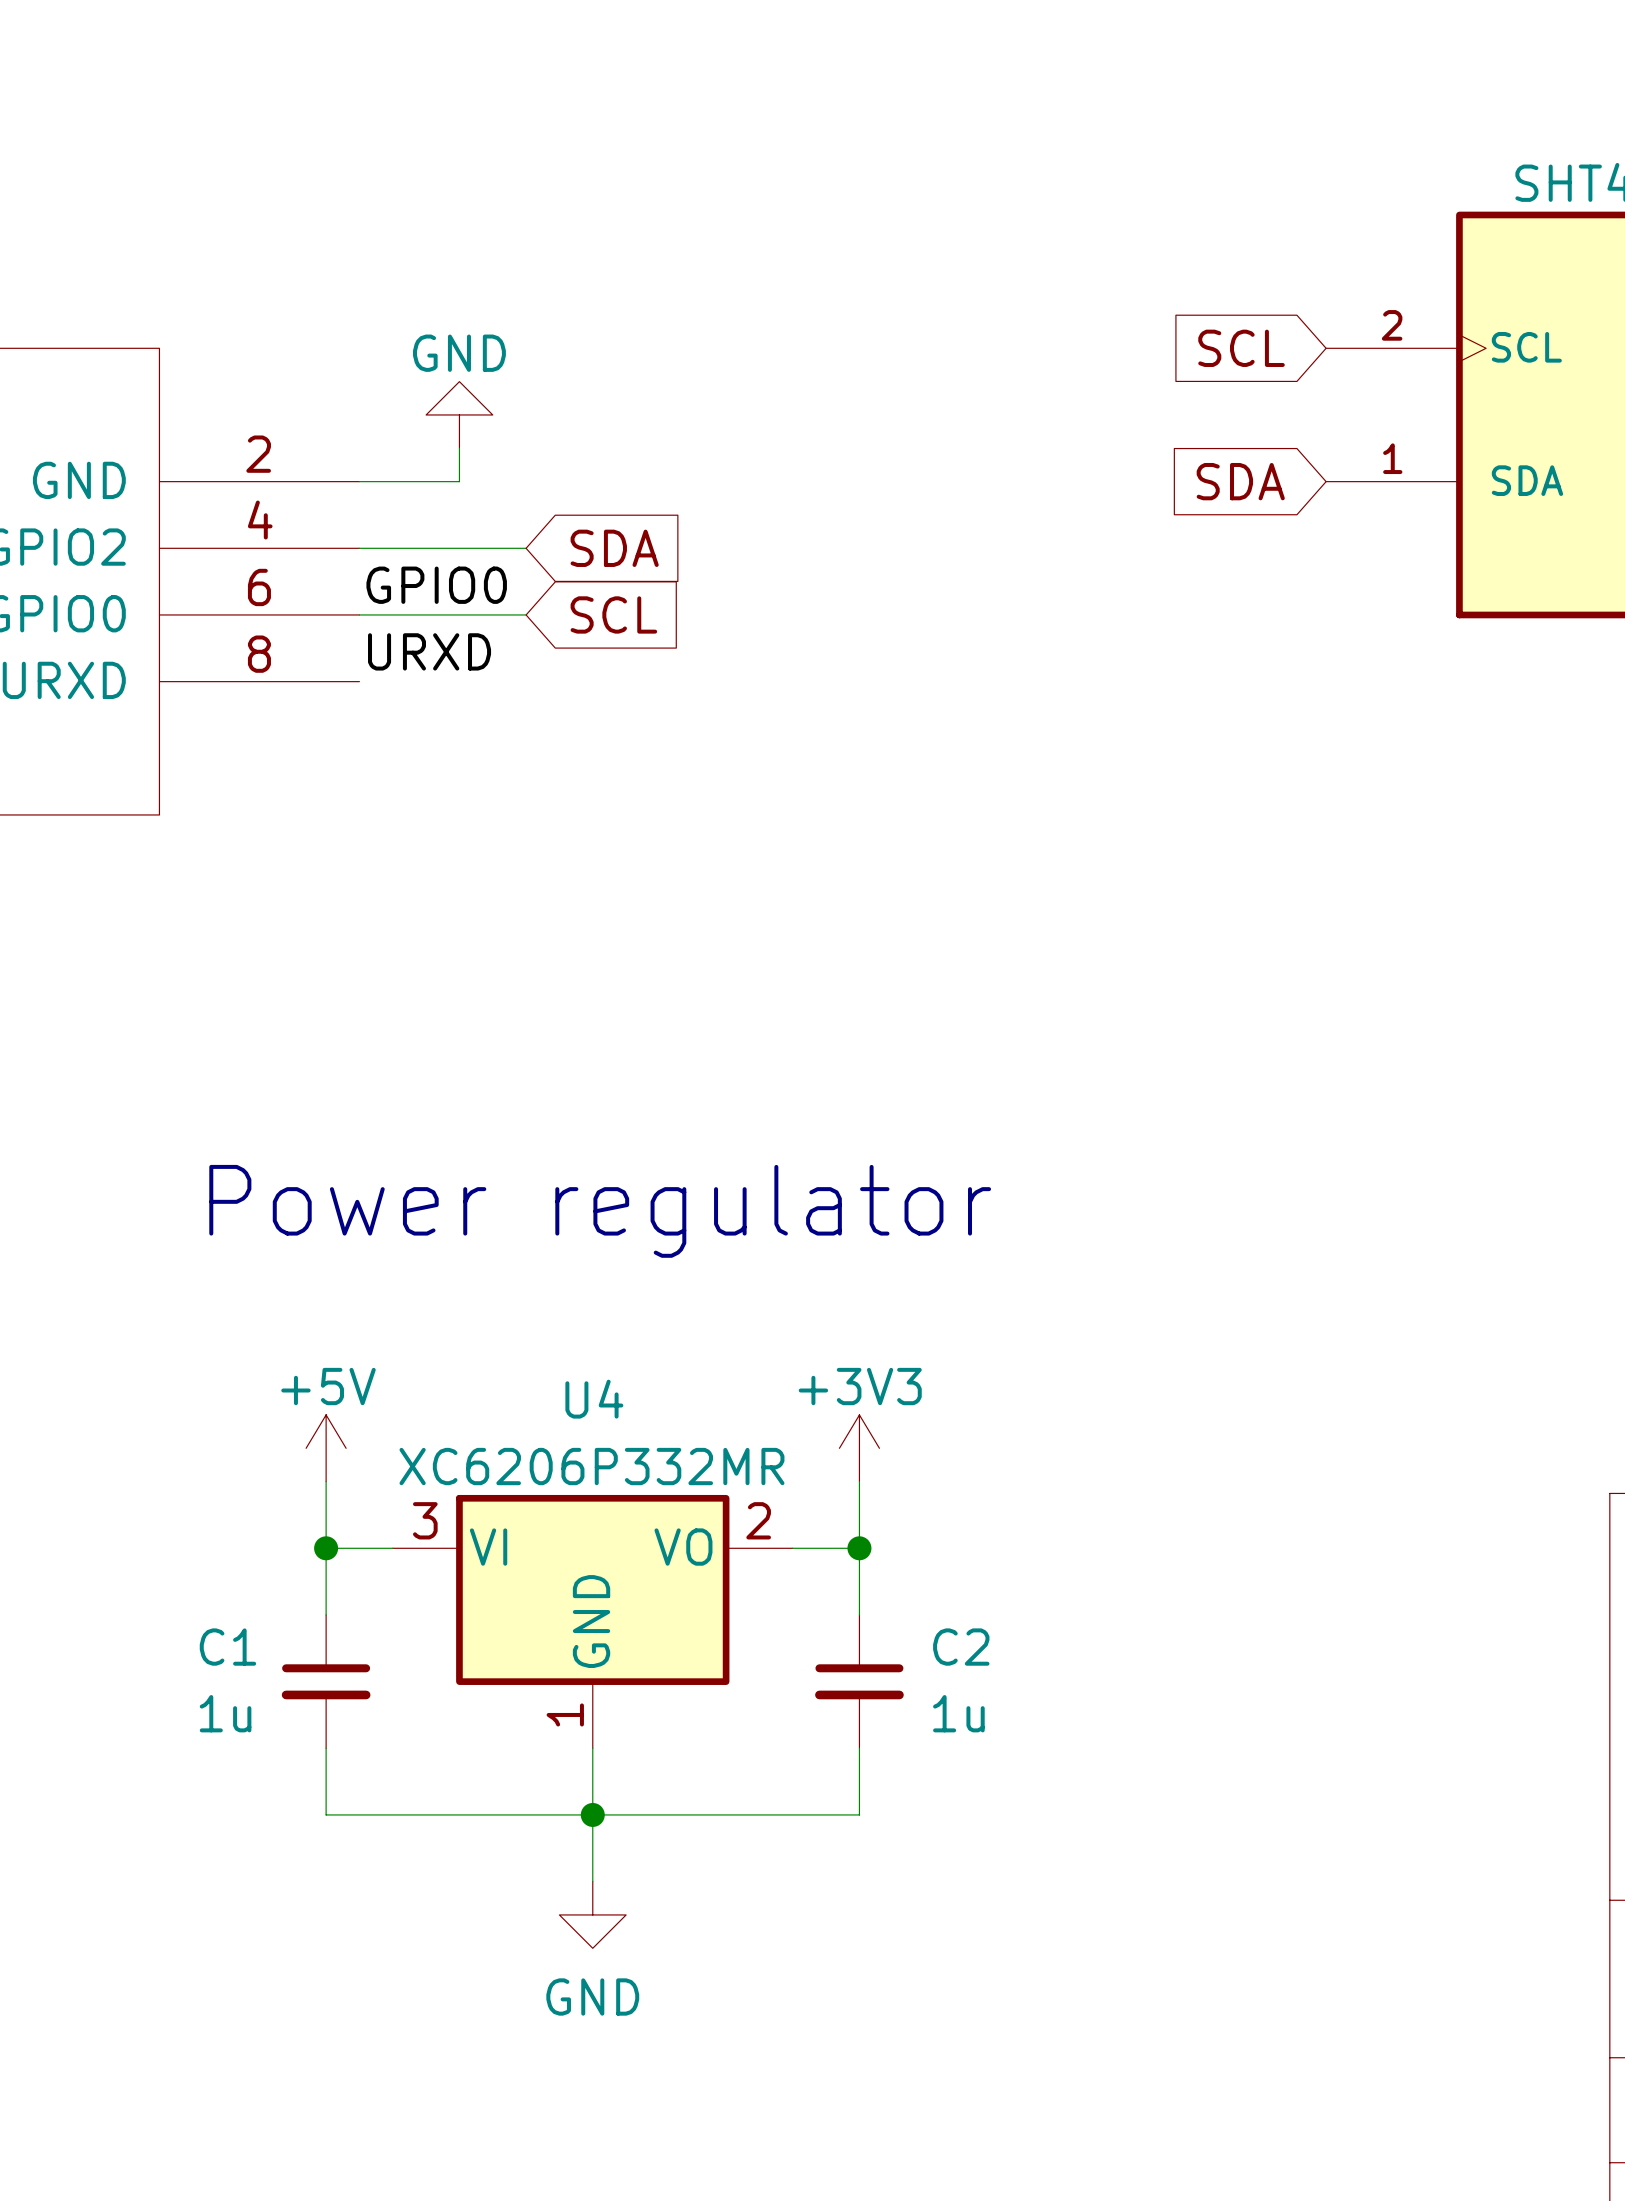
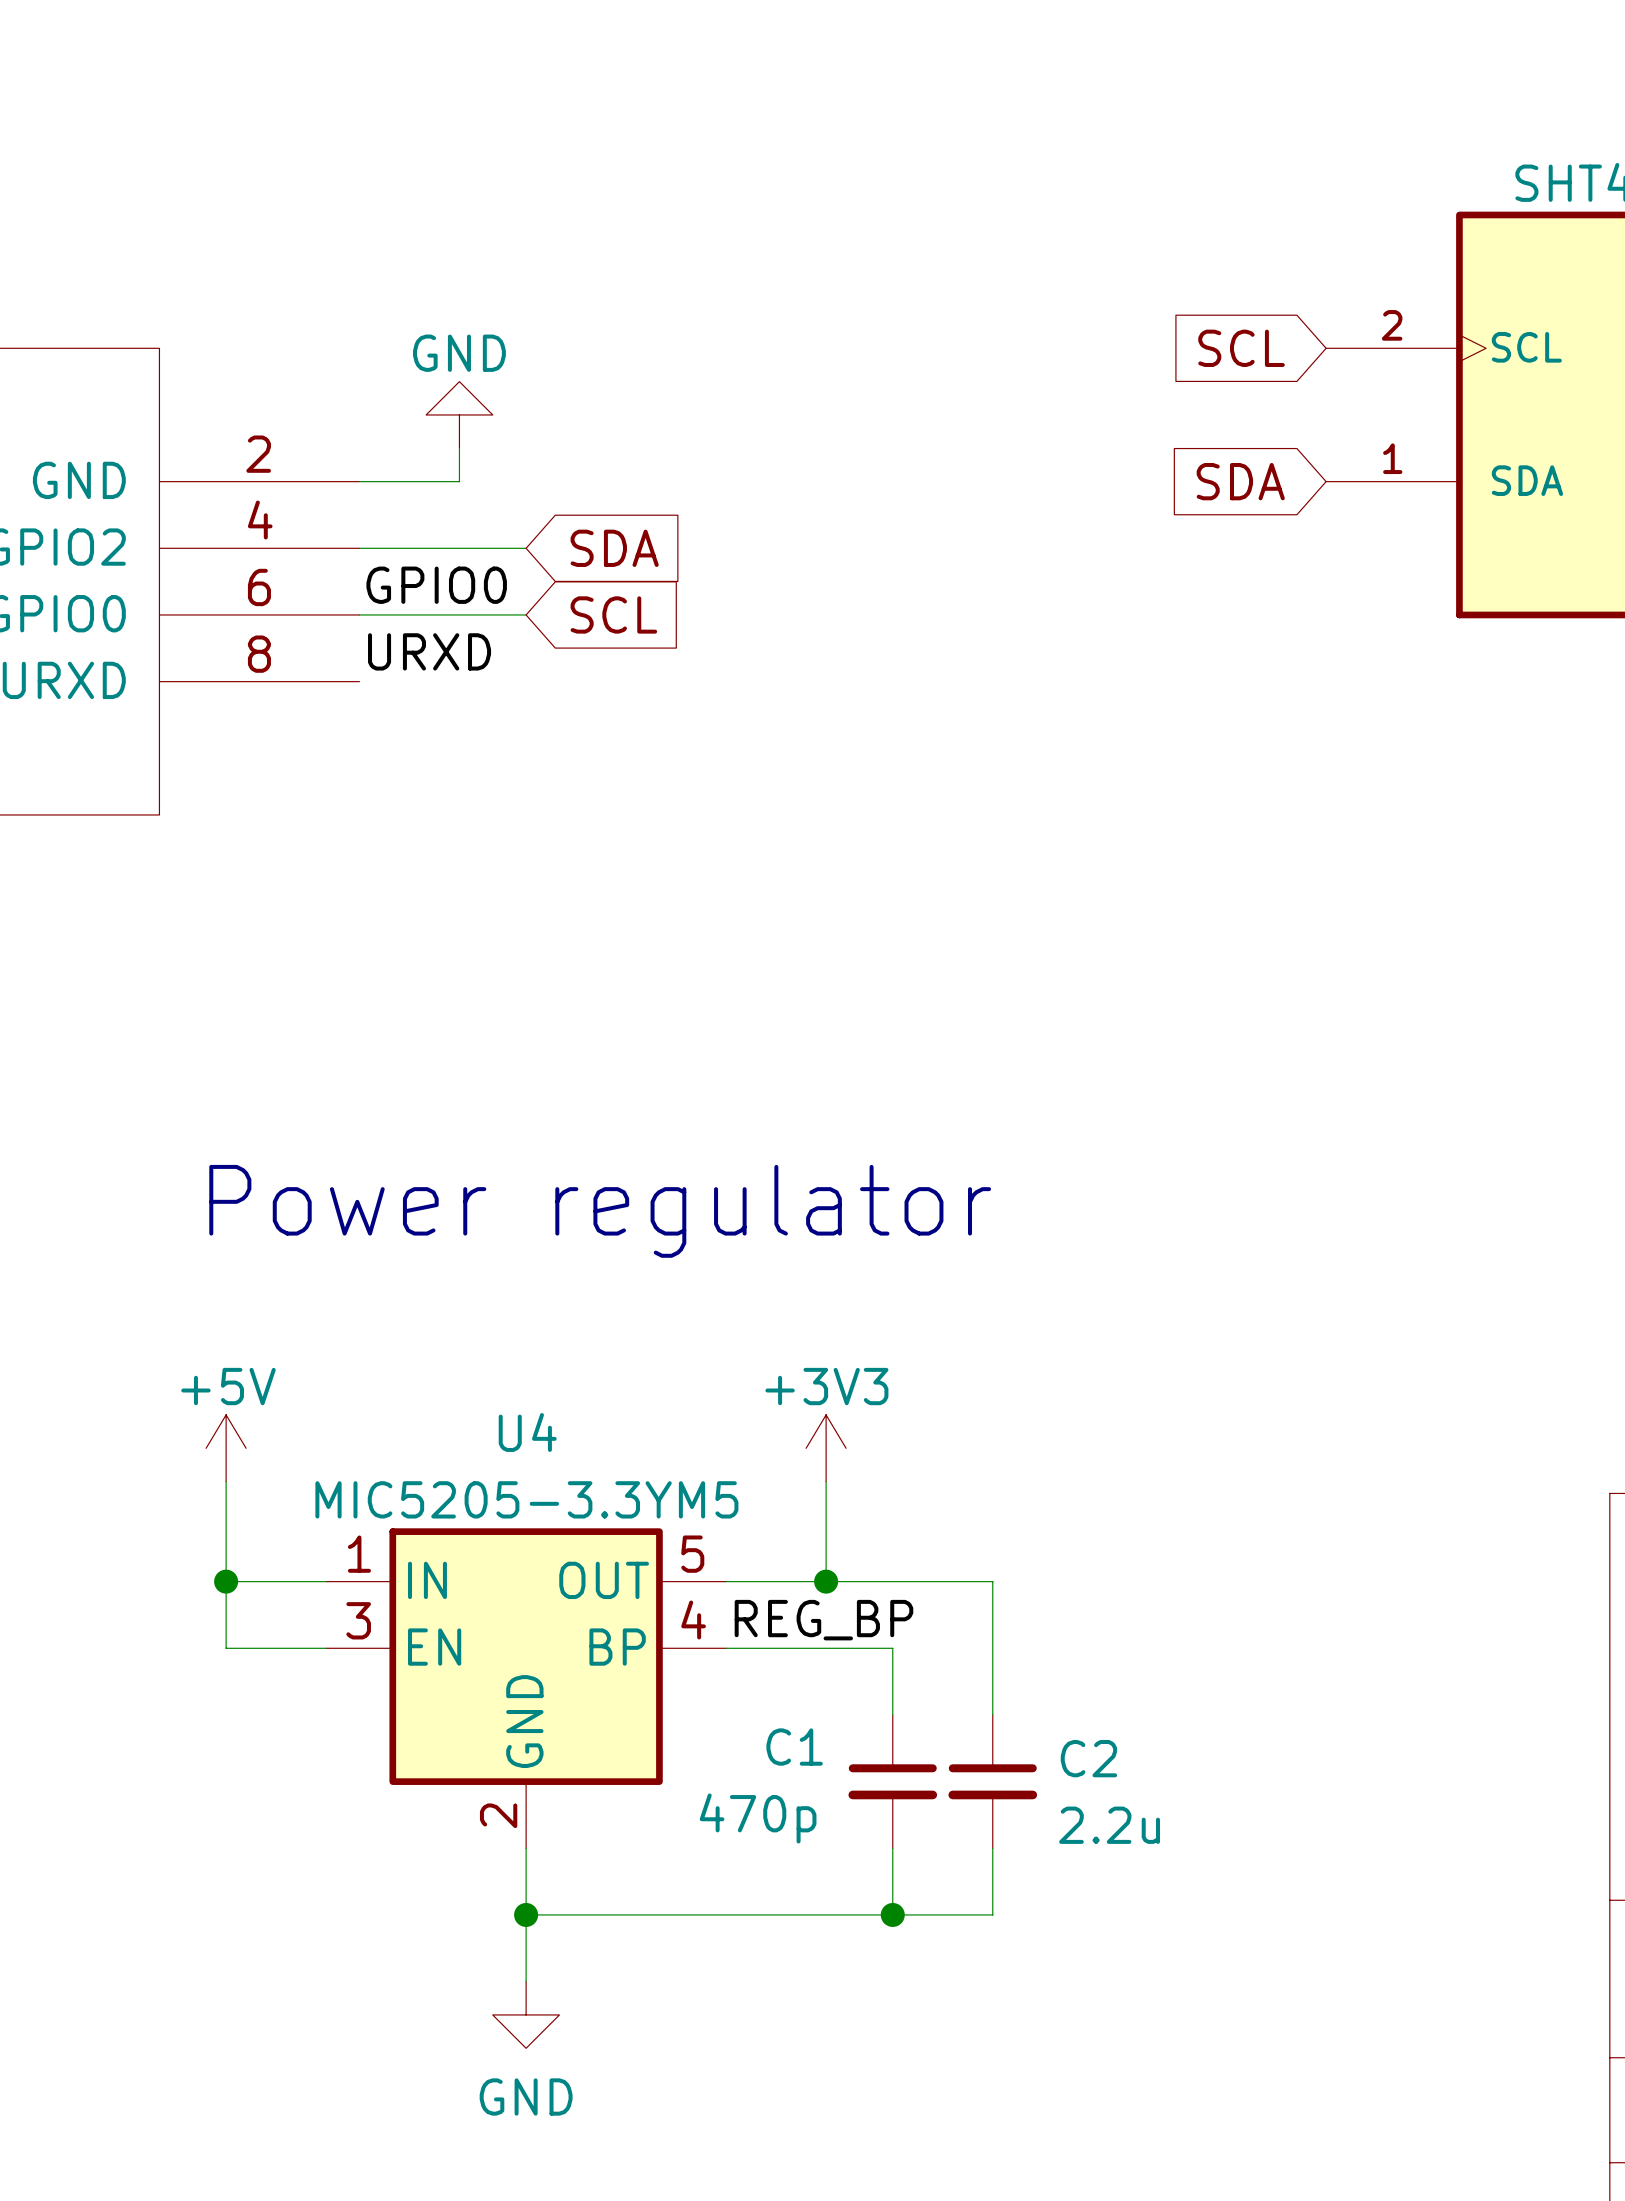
power symbol position: +5V (326, 1448) -> +5V (226, 1448)
power symbol position: +3V3 (859, 1448) -> +3V3 (826, 1448)
U4 value: XC6206P332MR (591, 1466) -> MIC5205-3.3YM5 (526, 1499)
wire: none -> (226, 1481) (226, 1648) (326, 1648)
wire: (326, 1481) (326, 1614) -> none
wire: none -> (826, 1481) (826, 1581)
wire: (859, 1481) (859, 1614) -> none
U4 symbol: [392, 1494, 793, 1749] -> [326, 1528, 727, 1849]
wire: (326, 1548) (392, 1548) -> none
junction position: (326, 1548) -> (226, 1581)
wire: (792, 1548) (859, 1548) -> none
junction position: (859, 1548) -> (826, 1581)
wire: none -> (226, 1581) (326, 1581)
wire: none -> (726, 1581) (992, 1581) (992, 1714)
label: none -> REG_BP (823, 1620)
C2 name position: C2 (961, 1647) -> C2 (1088, 1758)
wire: none -> (726, 1648) (892, 1648) (892, 1714)
C1 position: (326, 1681) -> (892, 1781)
C2 position: (859, 1681) -> (992, 1781)
C1 value: 1u (225, 1713) -> 470p (758, 1818)
C2 value: 1u (958, 1713) -> 2.2u (1109, 1825)
wire: (326, 1748) (326, 1814) (859, 1814) (859, 1748) -> none
wire: (592, 1748) (592, 1881) -> (526, 1848) (526, 1981)
junction position: (592, 1814) -> (526, 1914)
wire: none -> (892, 1848) (892, 1914)
wire: none -> (992, 1848) (992, 1914) (526, 1914)
power symbol position: GND (592, 1914) -> GND (526, 2014)
junction: none -> (892, 1914)

